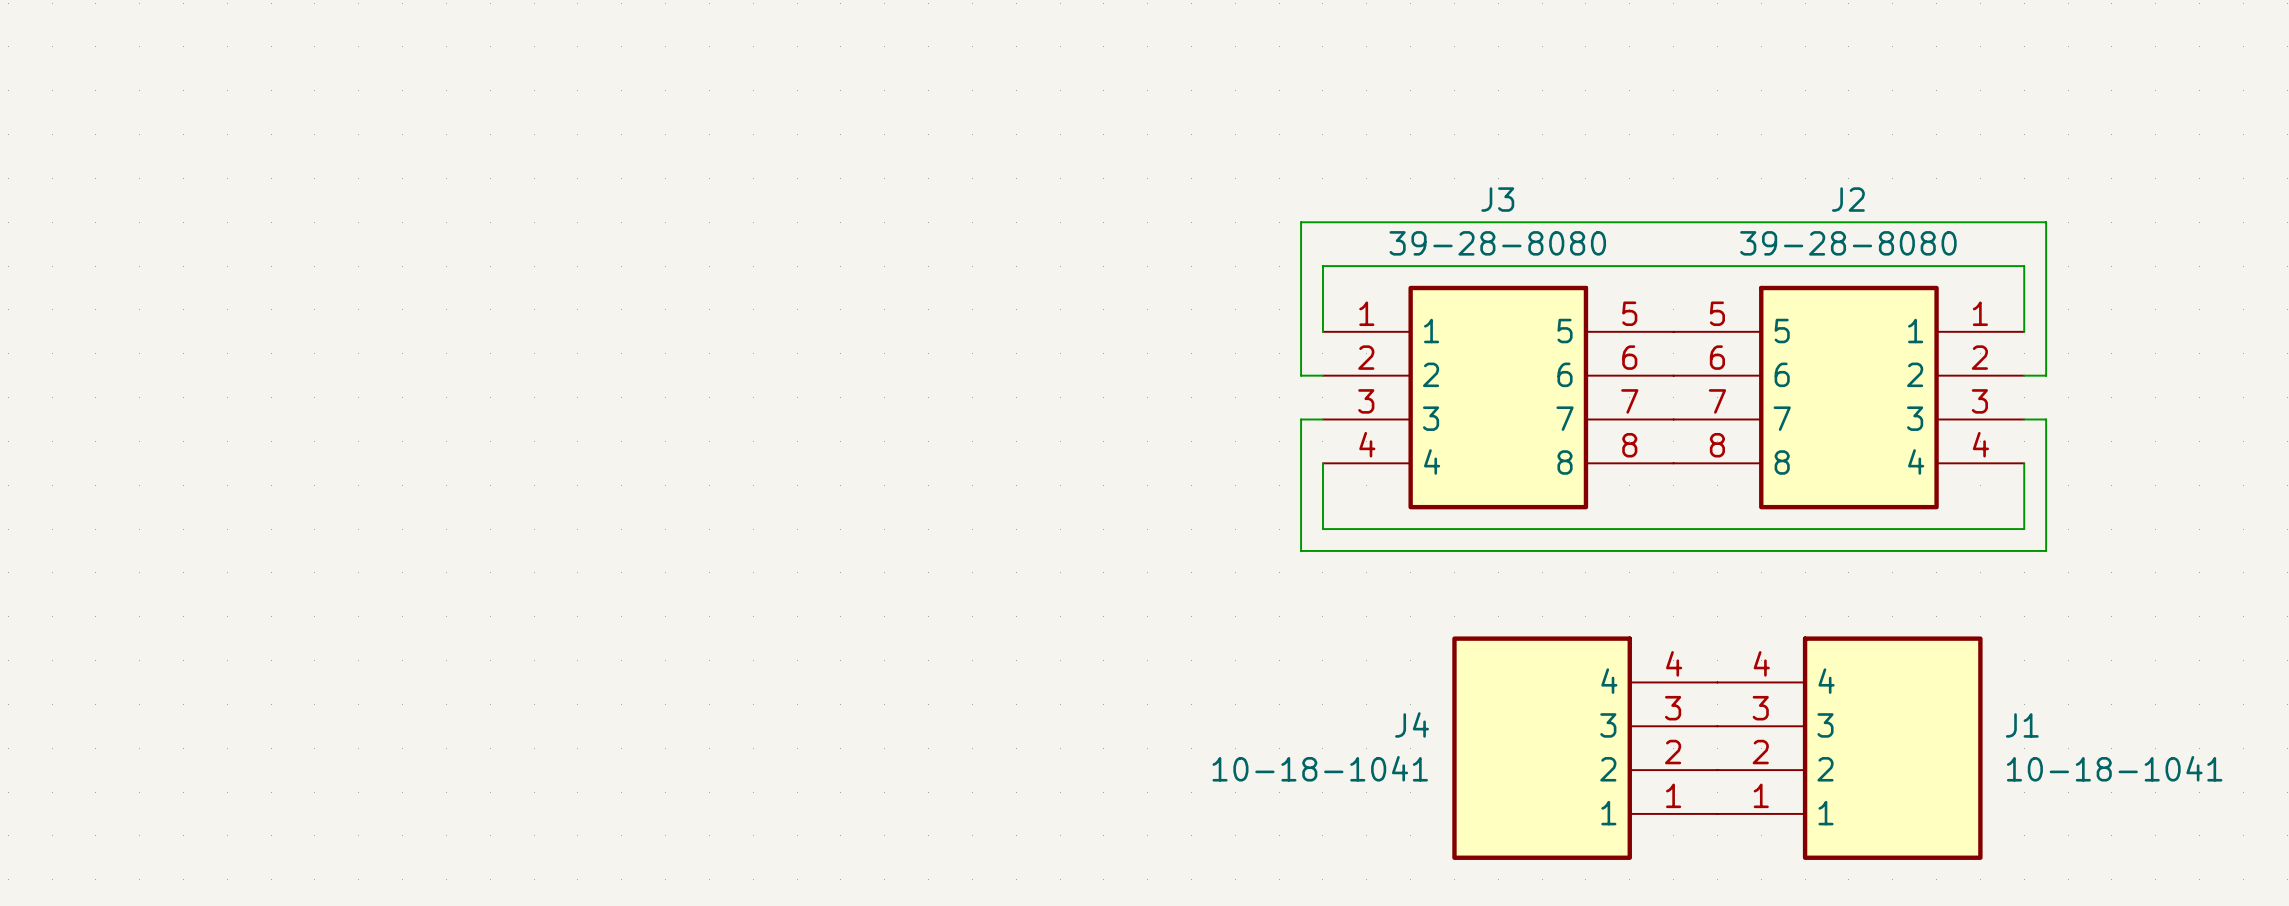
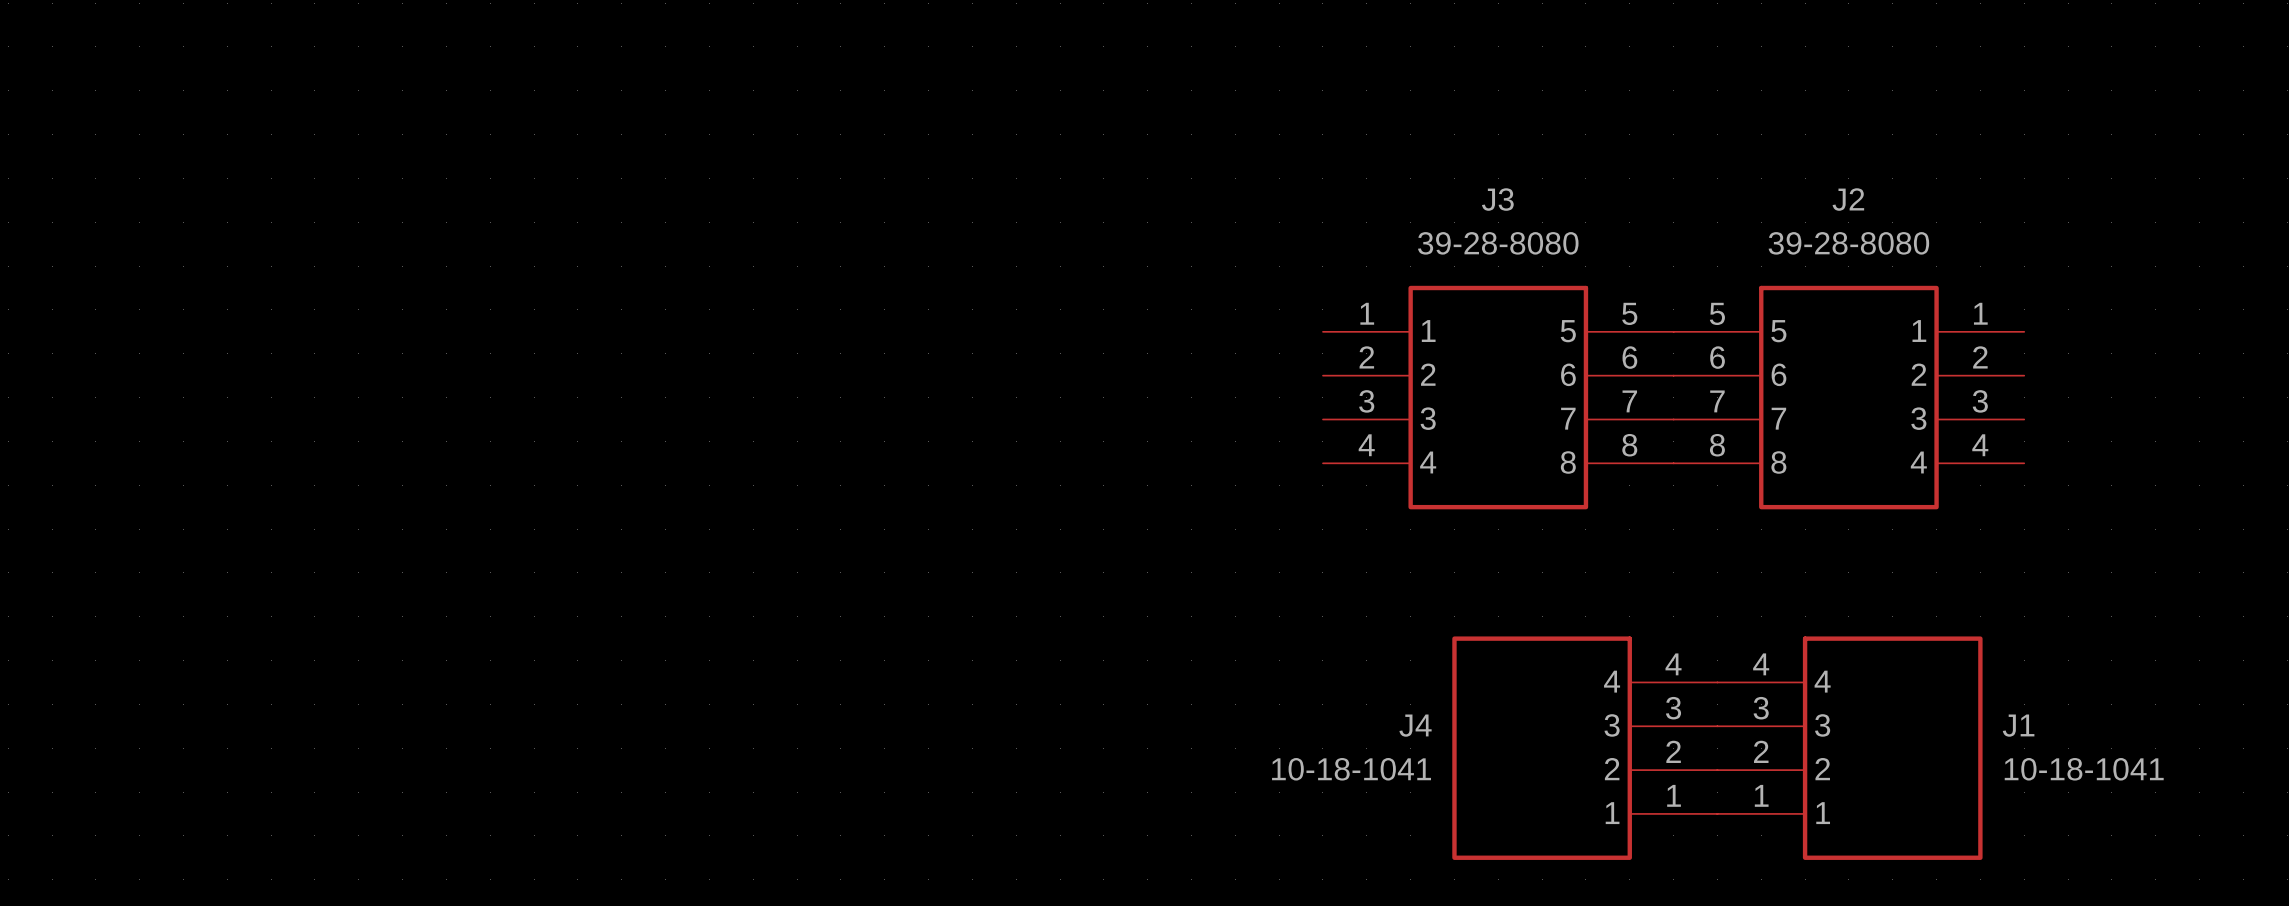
wire: (1322, 331) (1322, 266) (2024, 266) (2024, 331) -> none
wire: (1322, 375) (1301, 375) (1301, 222) (2046, 222) (2046, 375) (2024, 375) -> none
wire: (1322, 419) (1301, 419) (1301, 550) (2046, 550) (2046, 419) (2024, 419) -> none
wire: (1322, 463) (1322, 529) (2024, 529) (2024, 463) -> none

